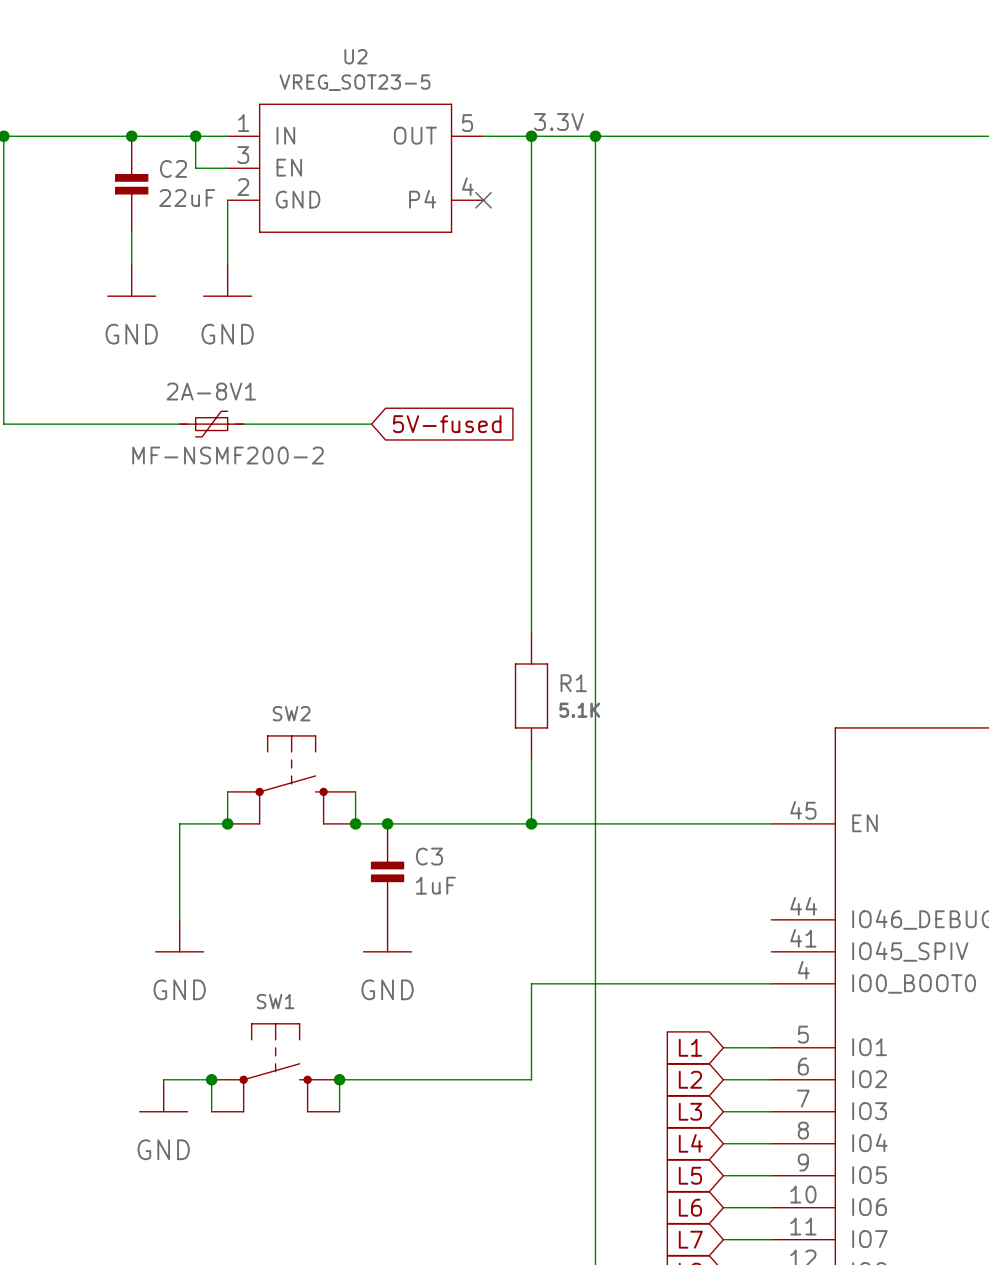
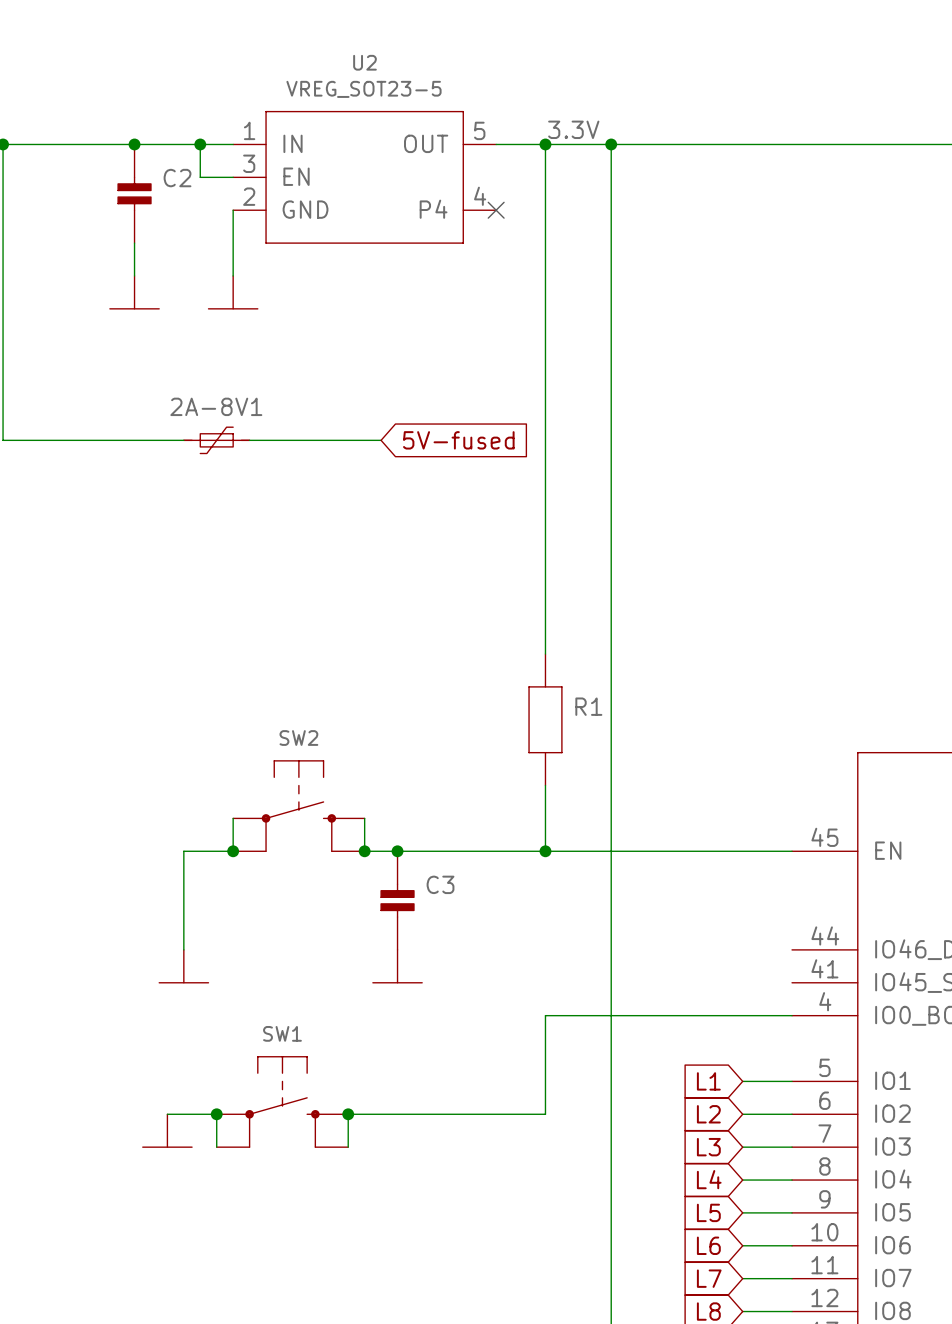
C2 value: 22uF (187, 198) -> none
power symbol text: GND (131, 334) -> none
power symbol text: GND (227, 334) -> none
2A-8V1 value: MF-NSMF200-2 (228, 455) -> none
R1 value: 5.1K (579, 710) -> none
C3 value: 1uF (435, 885) -> none
power symbol text: GND (179, 989) -> none
power symbol text: GND (387, 989) -> none
power symbol text: GND (163, 1149) -> none

